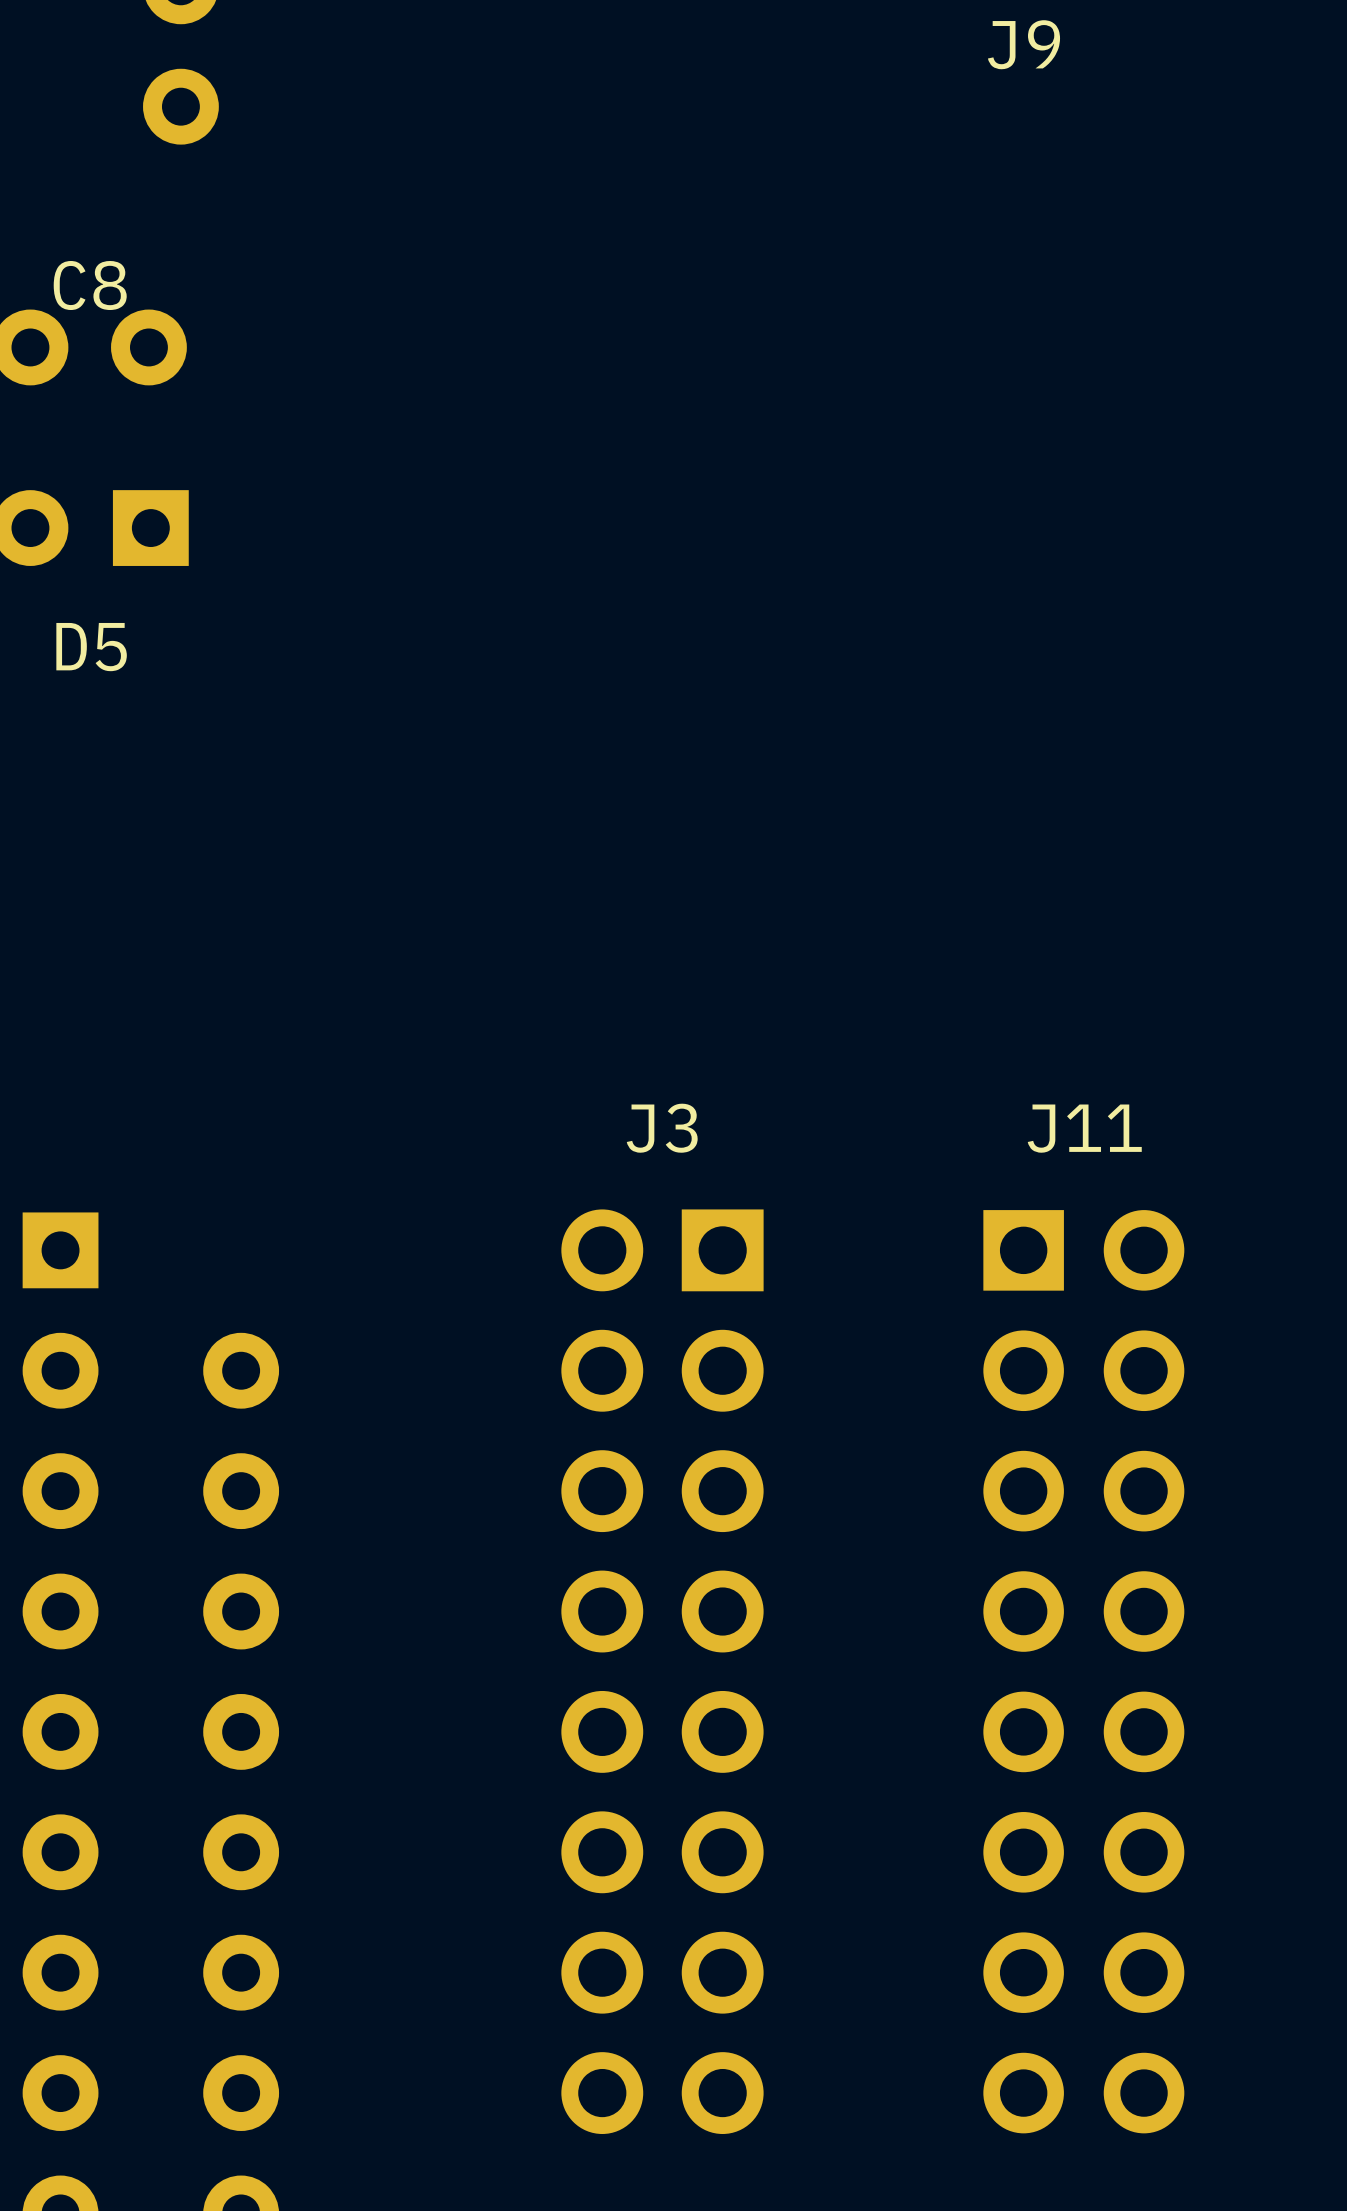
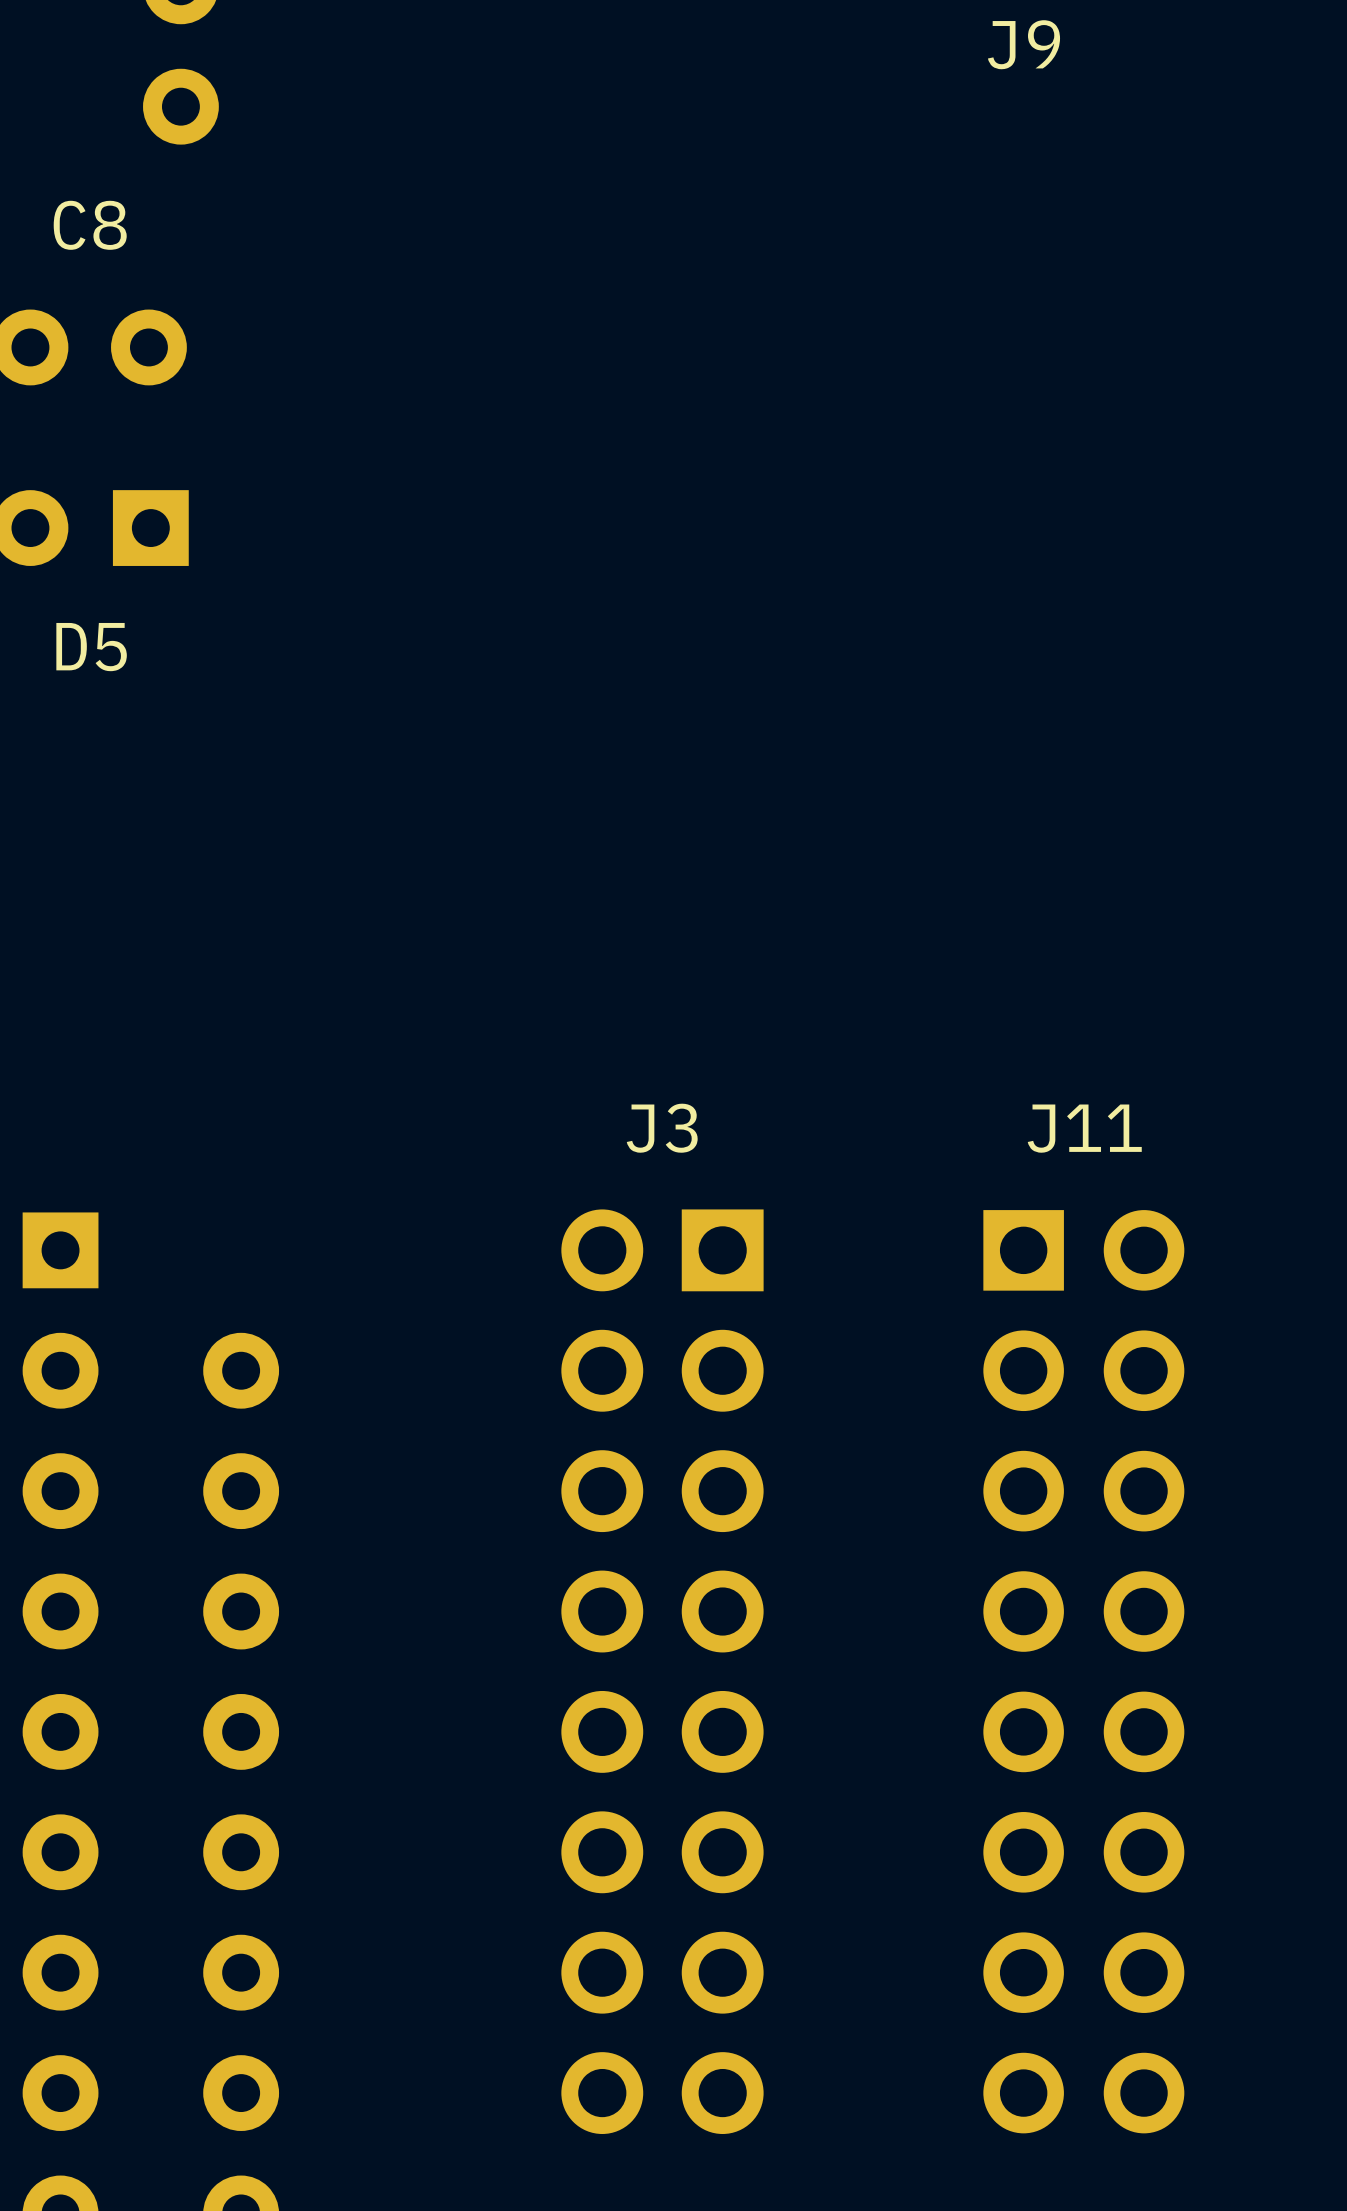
C8 name position: C8 (90, 285) -> C8 (90, 225)

